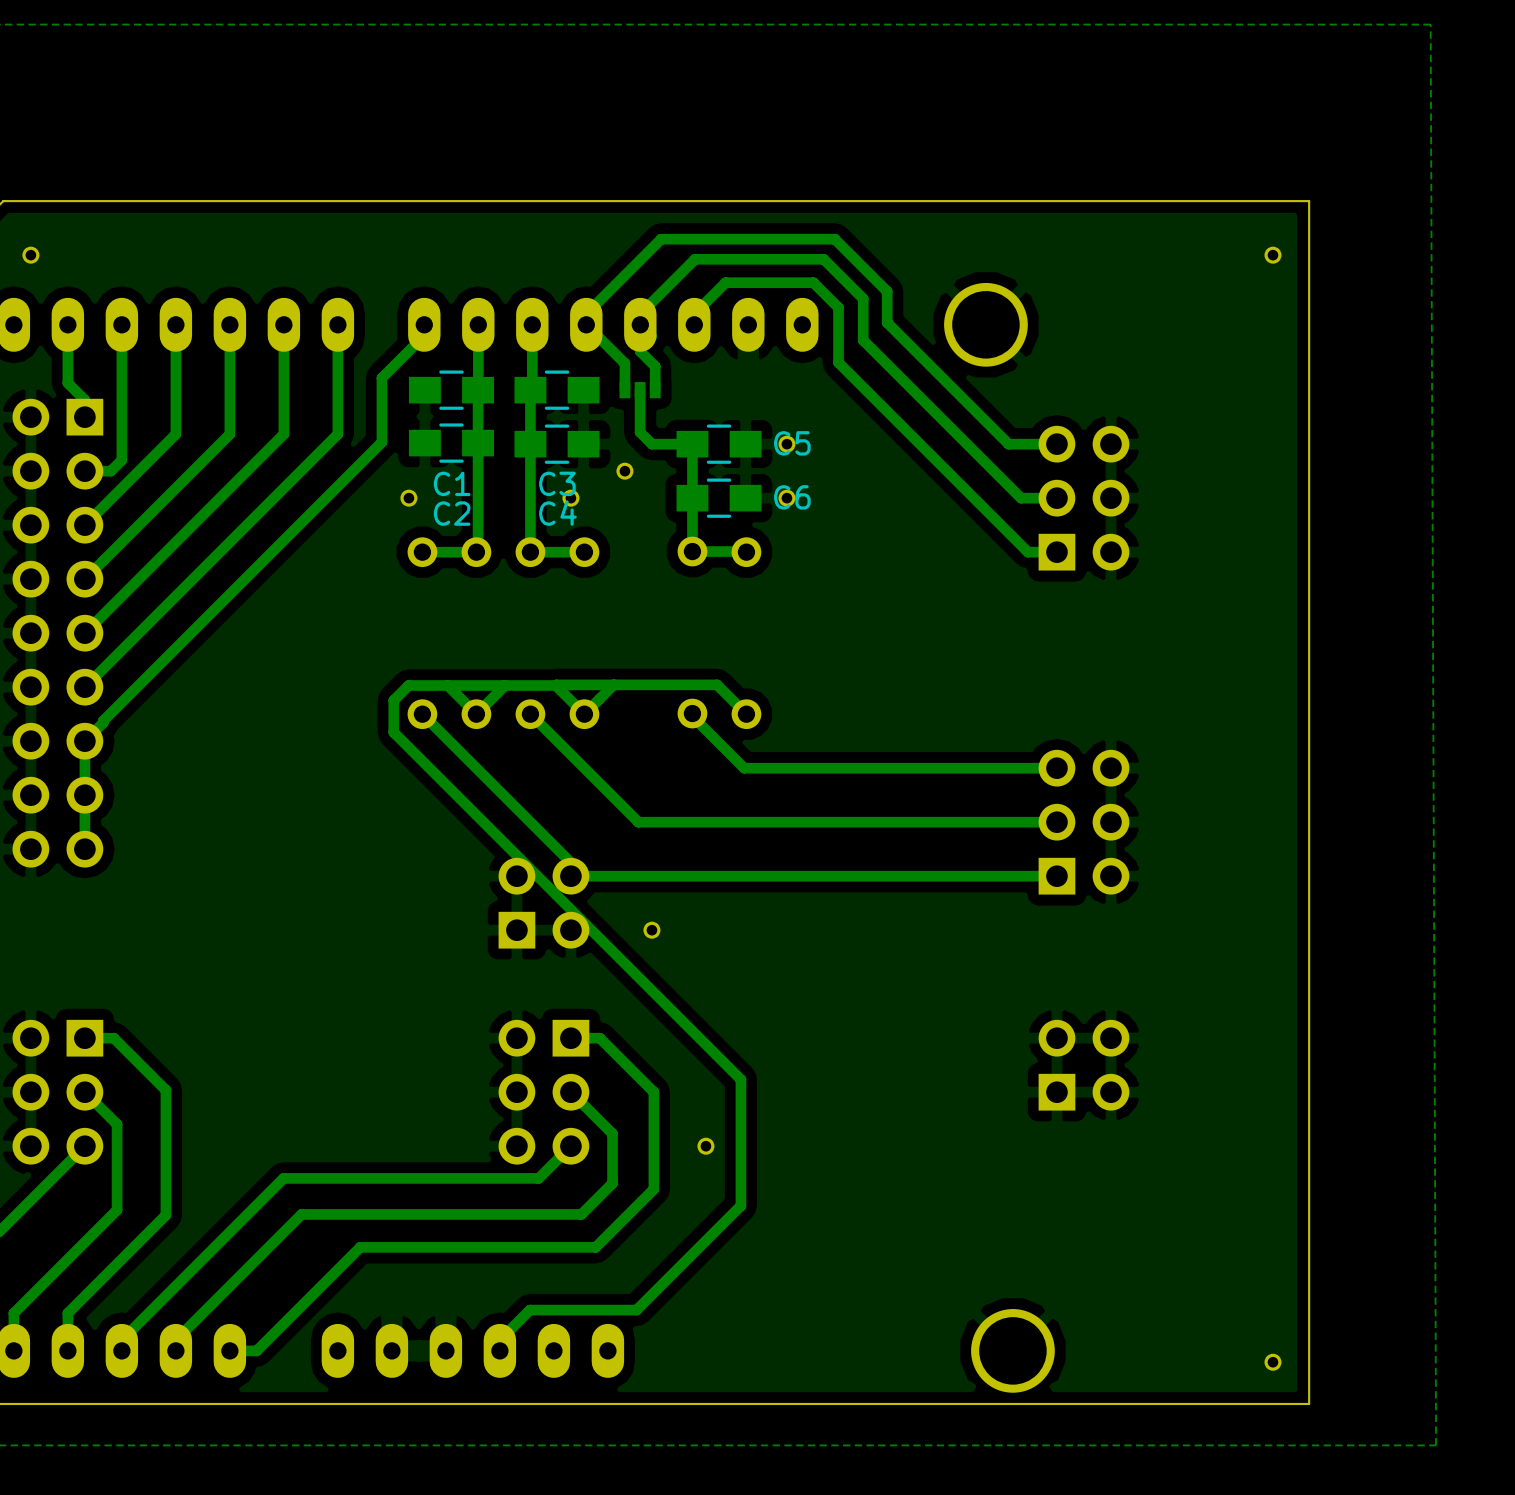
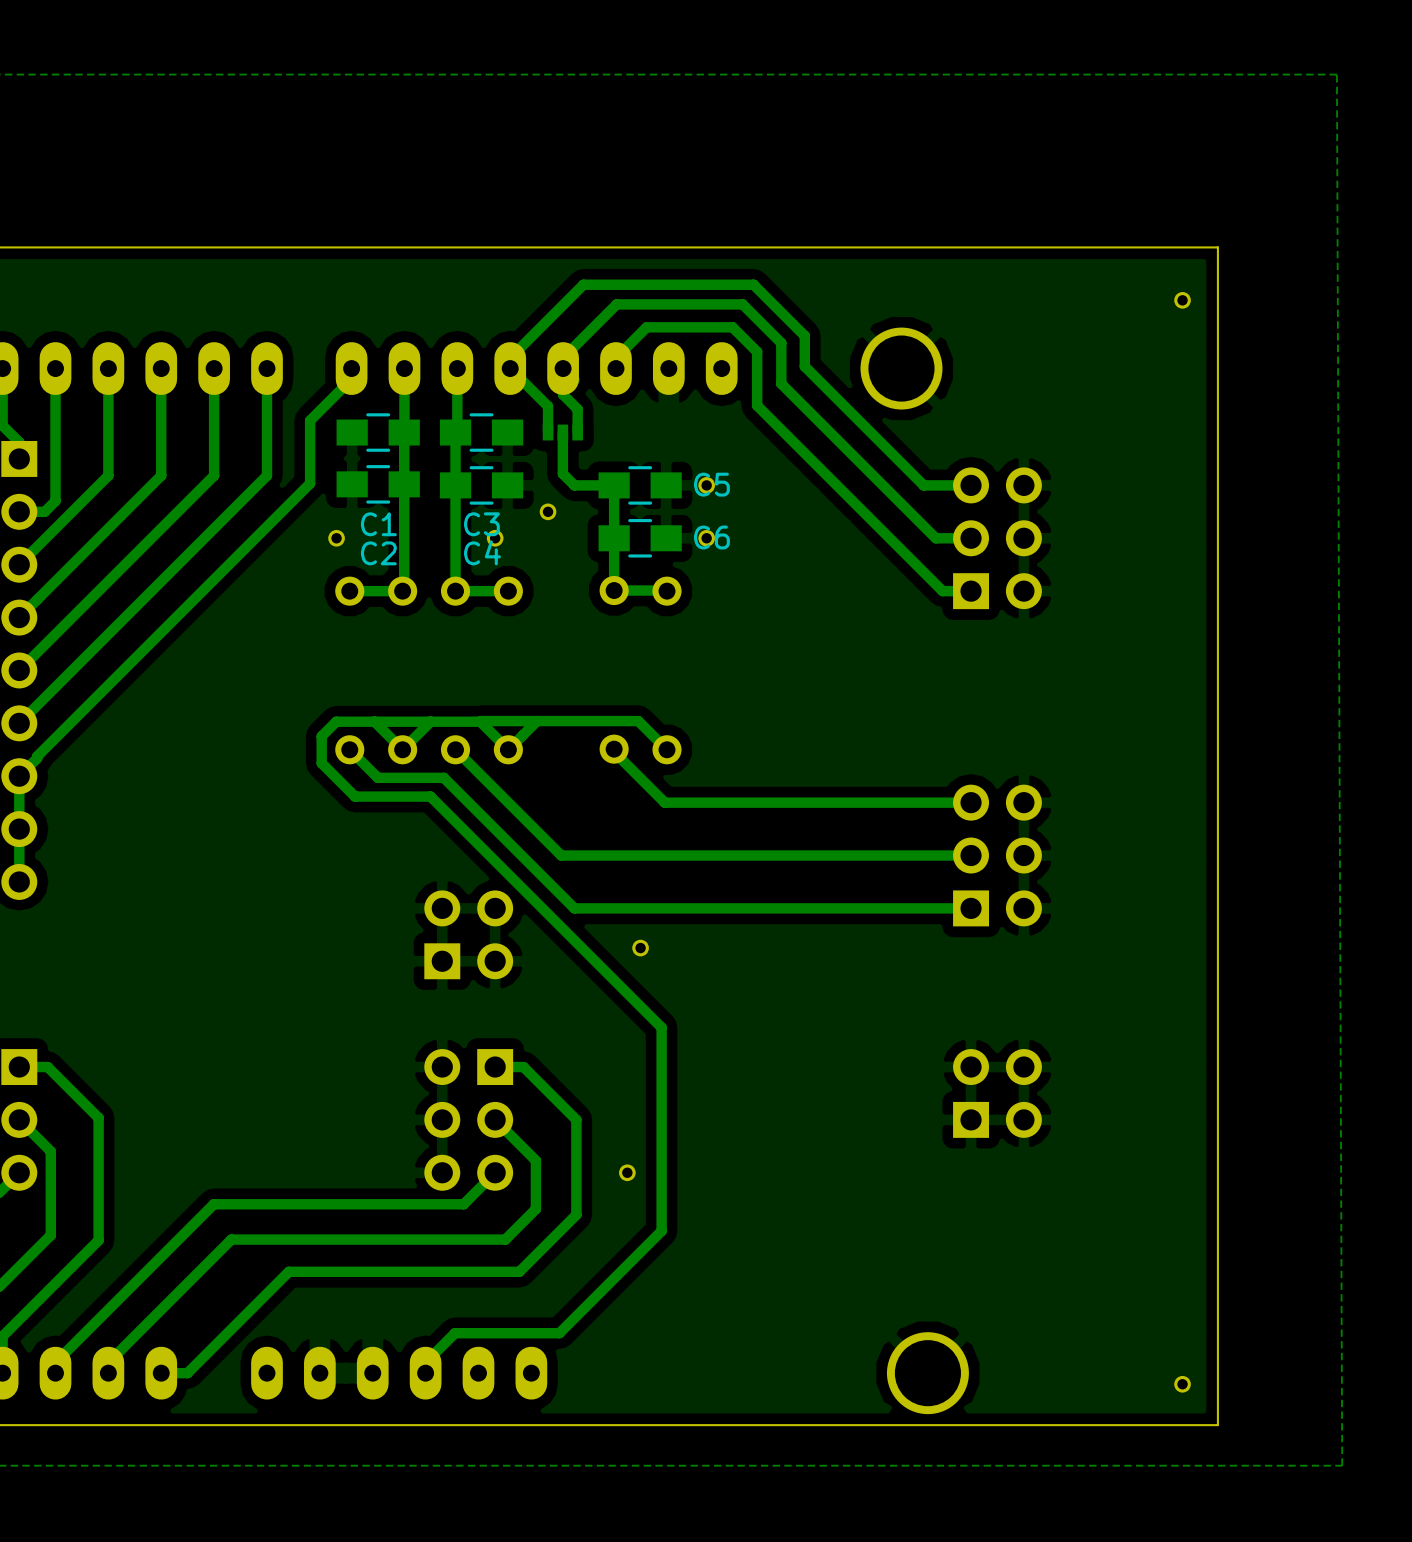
track: (393, 727) (393, 732) (740, 1079) -> (321, 763) (355, 796) (430, 796) (661, 1027) (661, 1107)
track: (451, 742) (584, 876) (651, 876) -> (377, 777) (443, 777) (574, 908)
part position: (651, 930) -> (640, 948)

